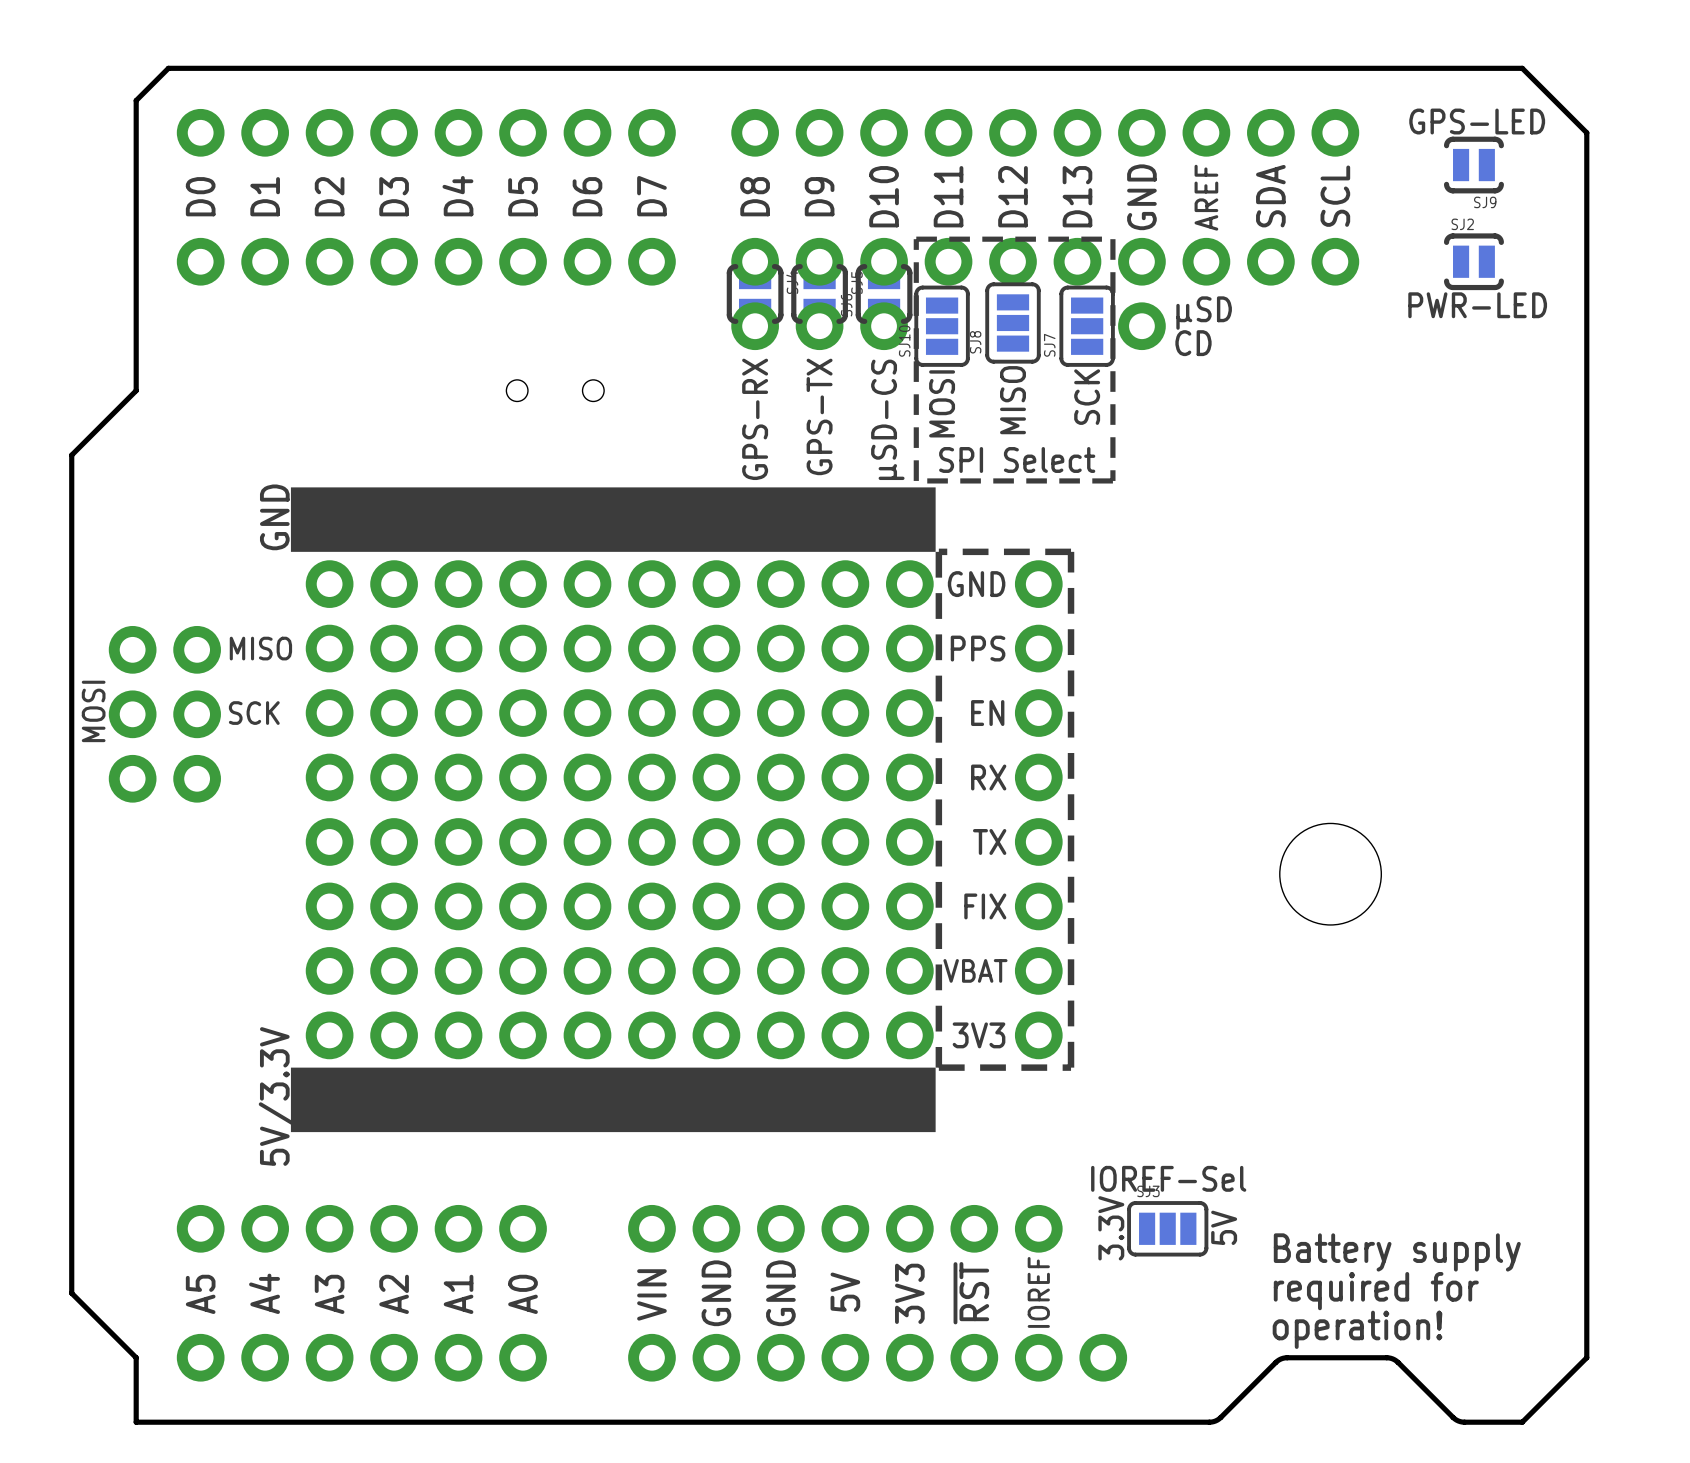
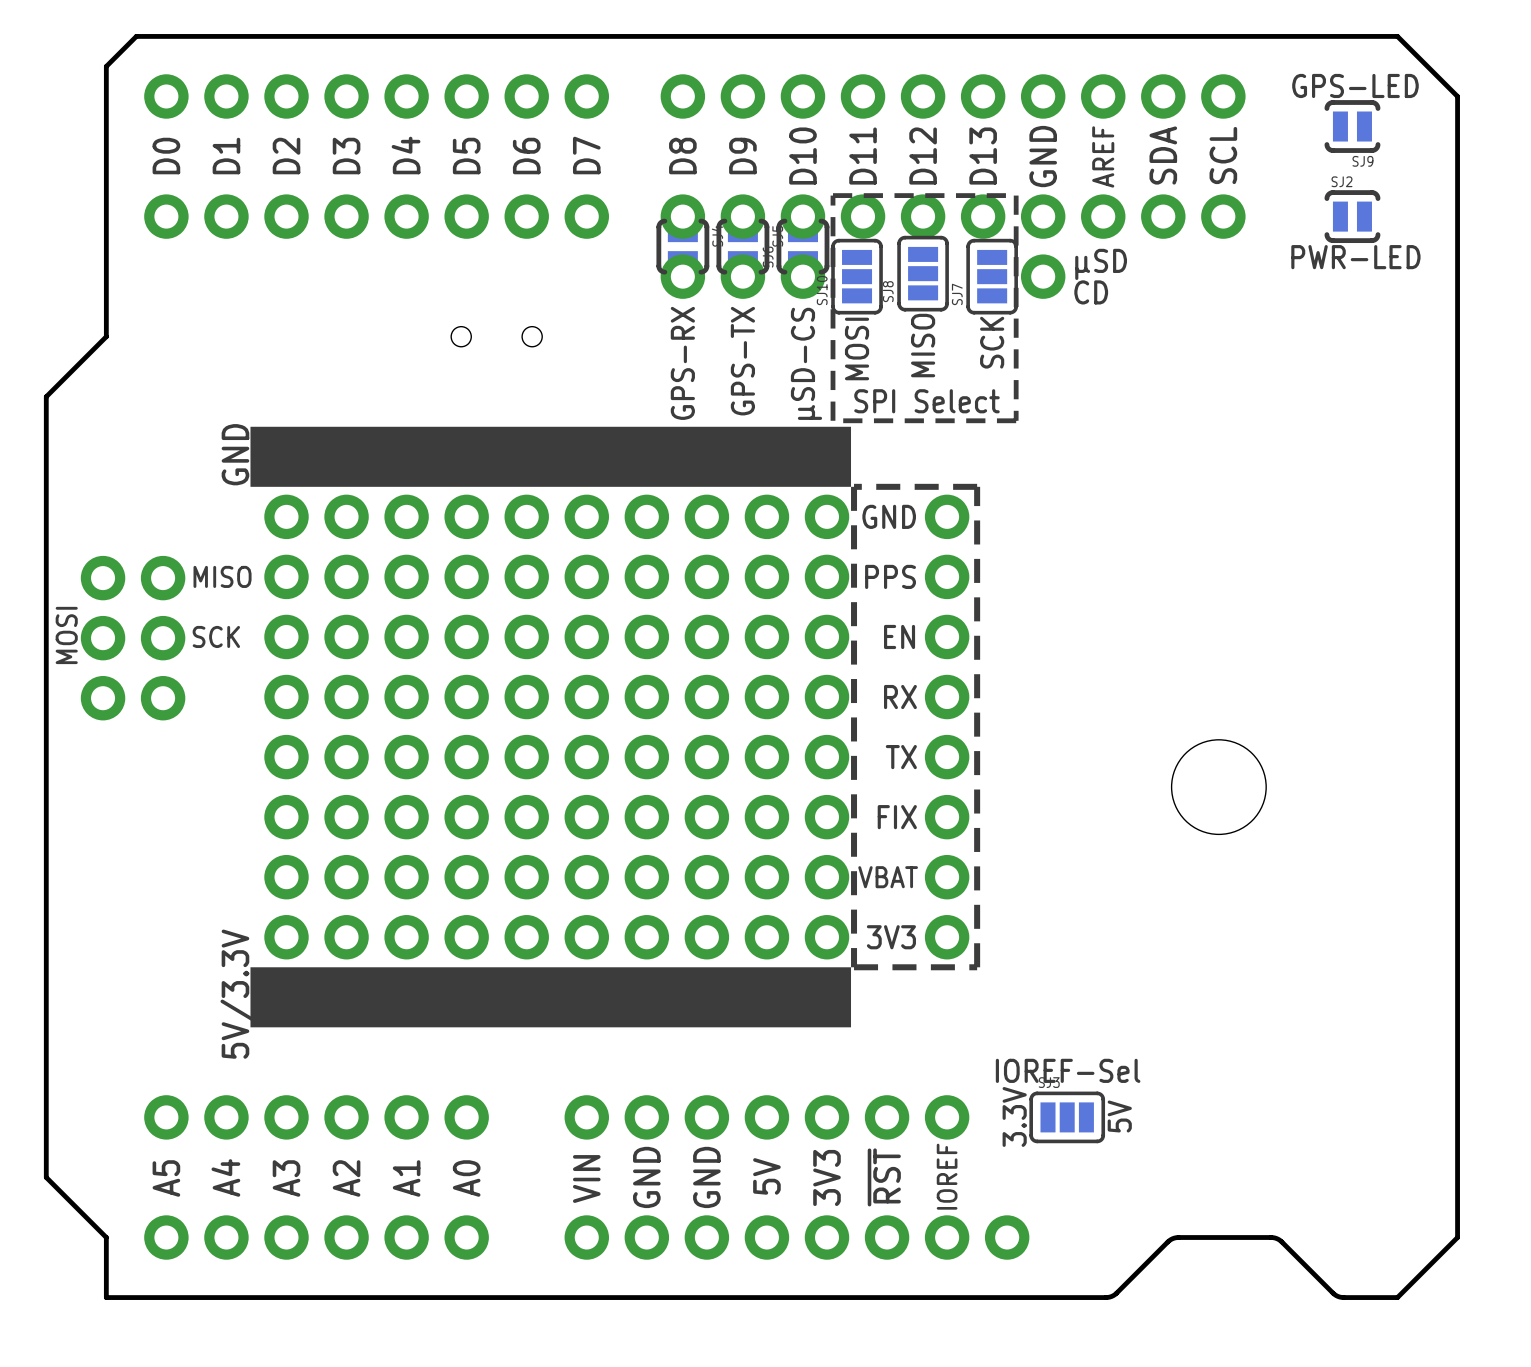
text: Battery supply (1397, 1252) -> none
text: required for (1376, 1291) -> none
text: operation! (1357, 1329) -> none

